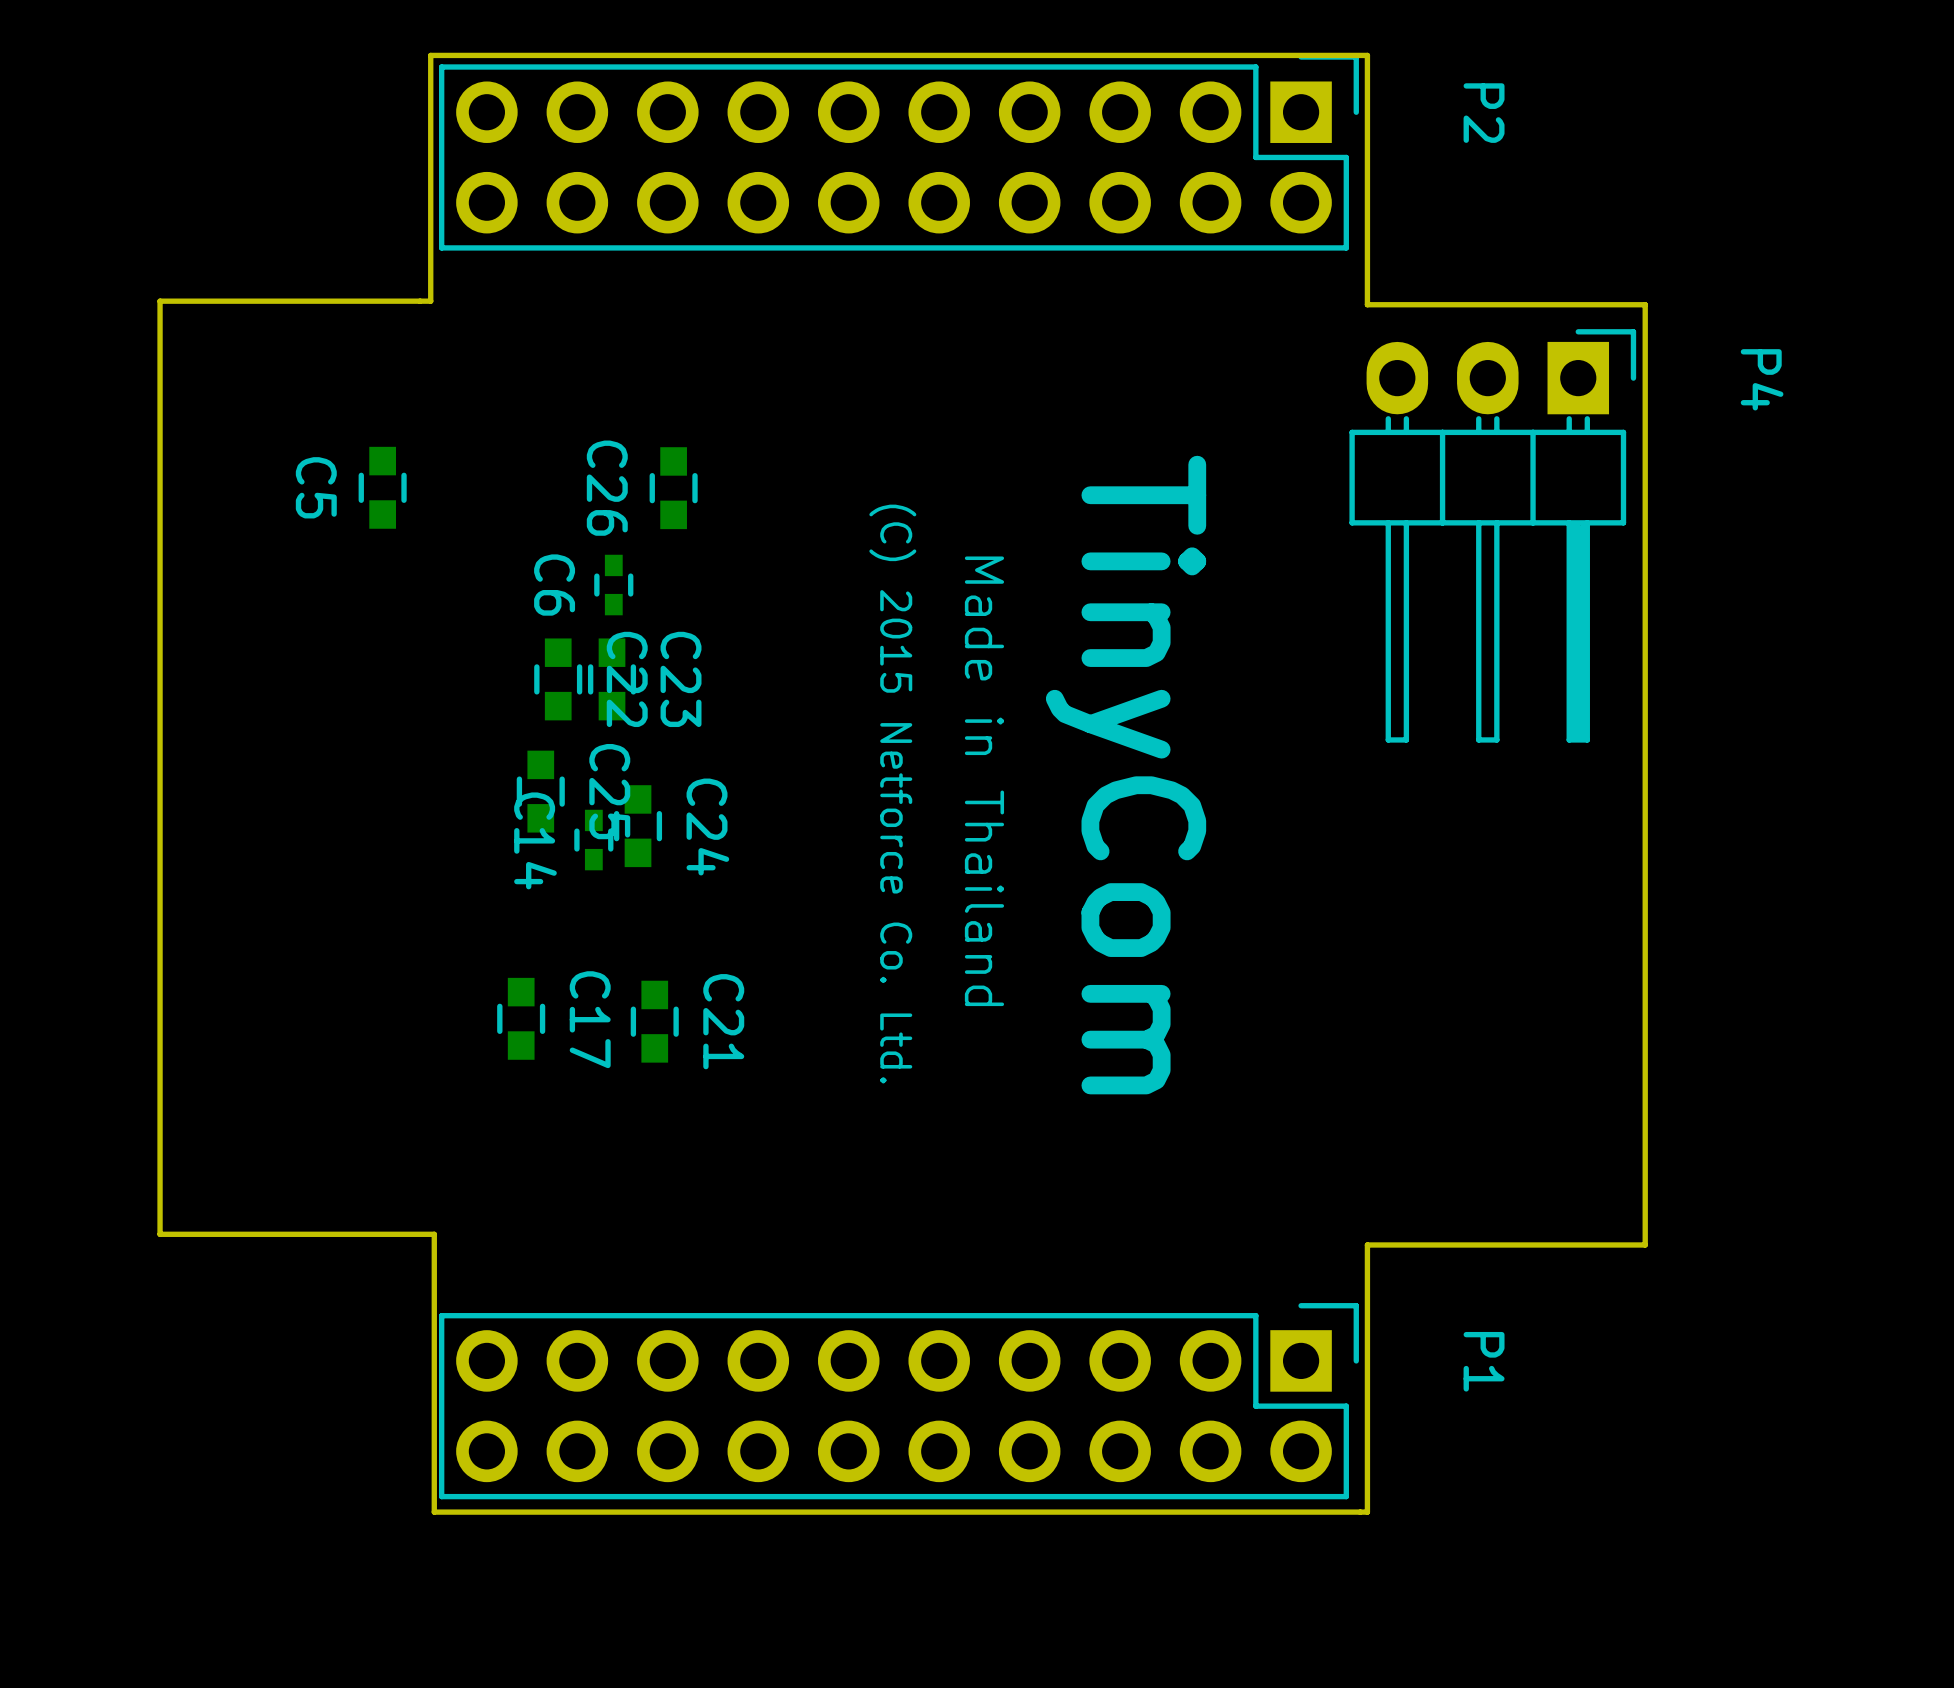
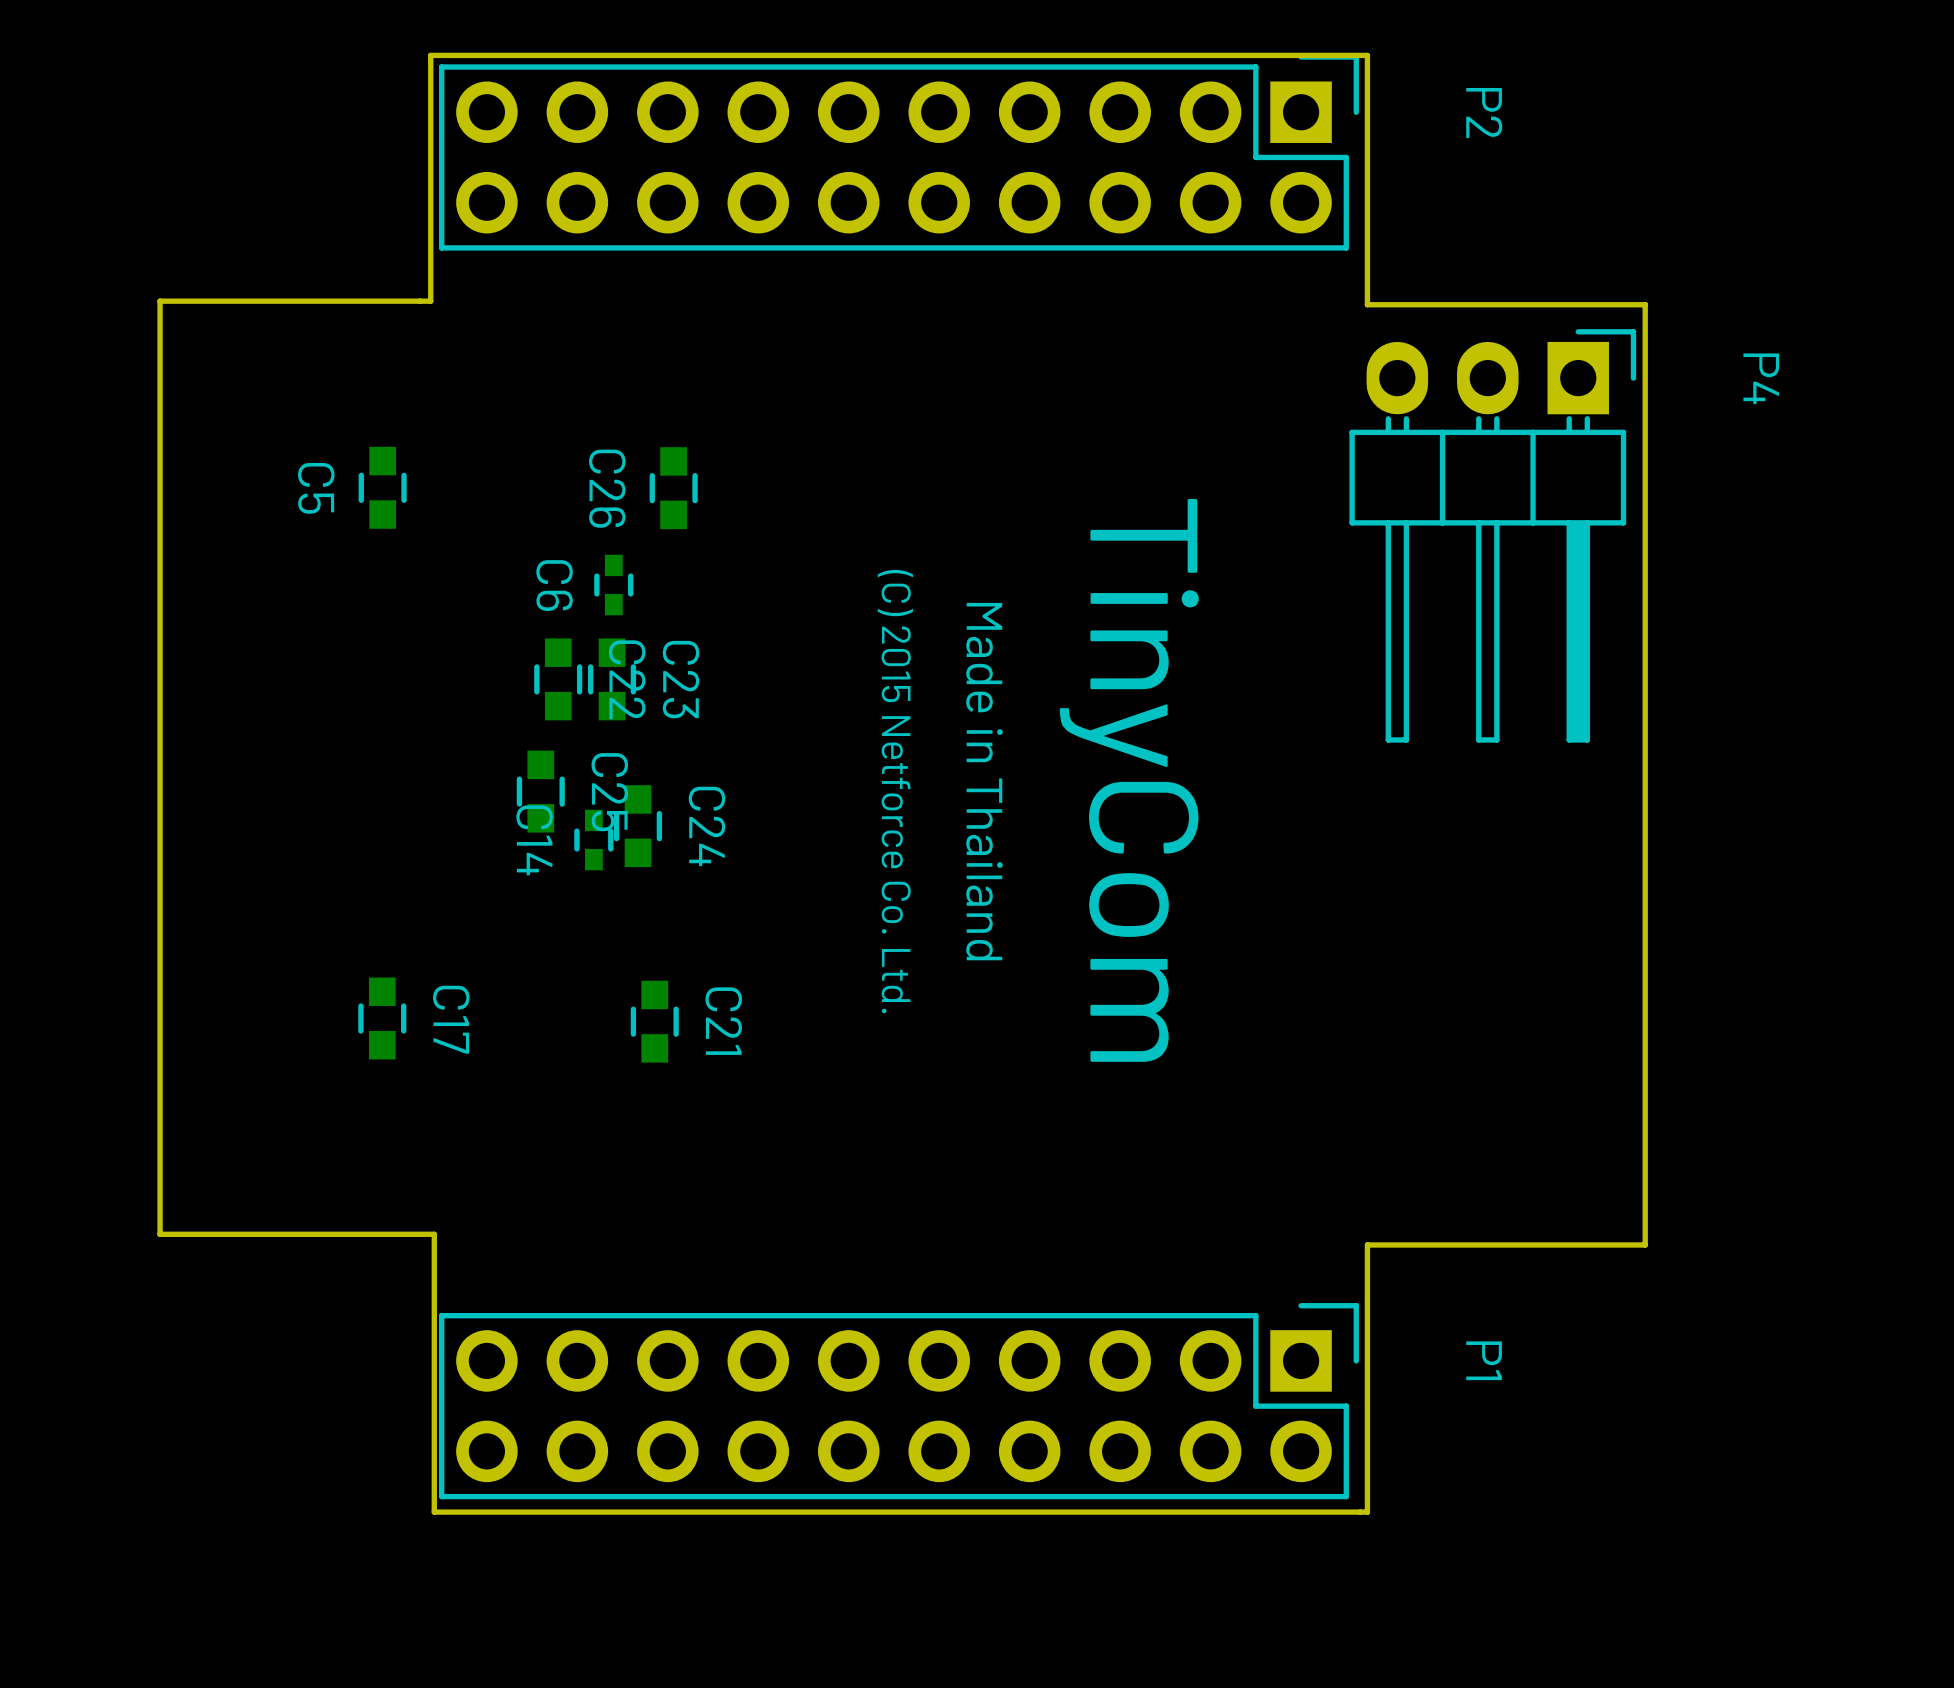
C17 position: (521, 1018) -> (382, 1018)

